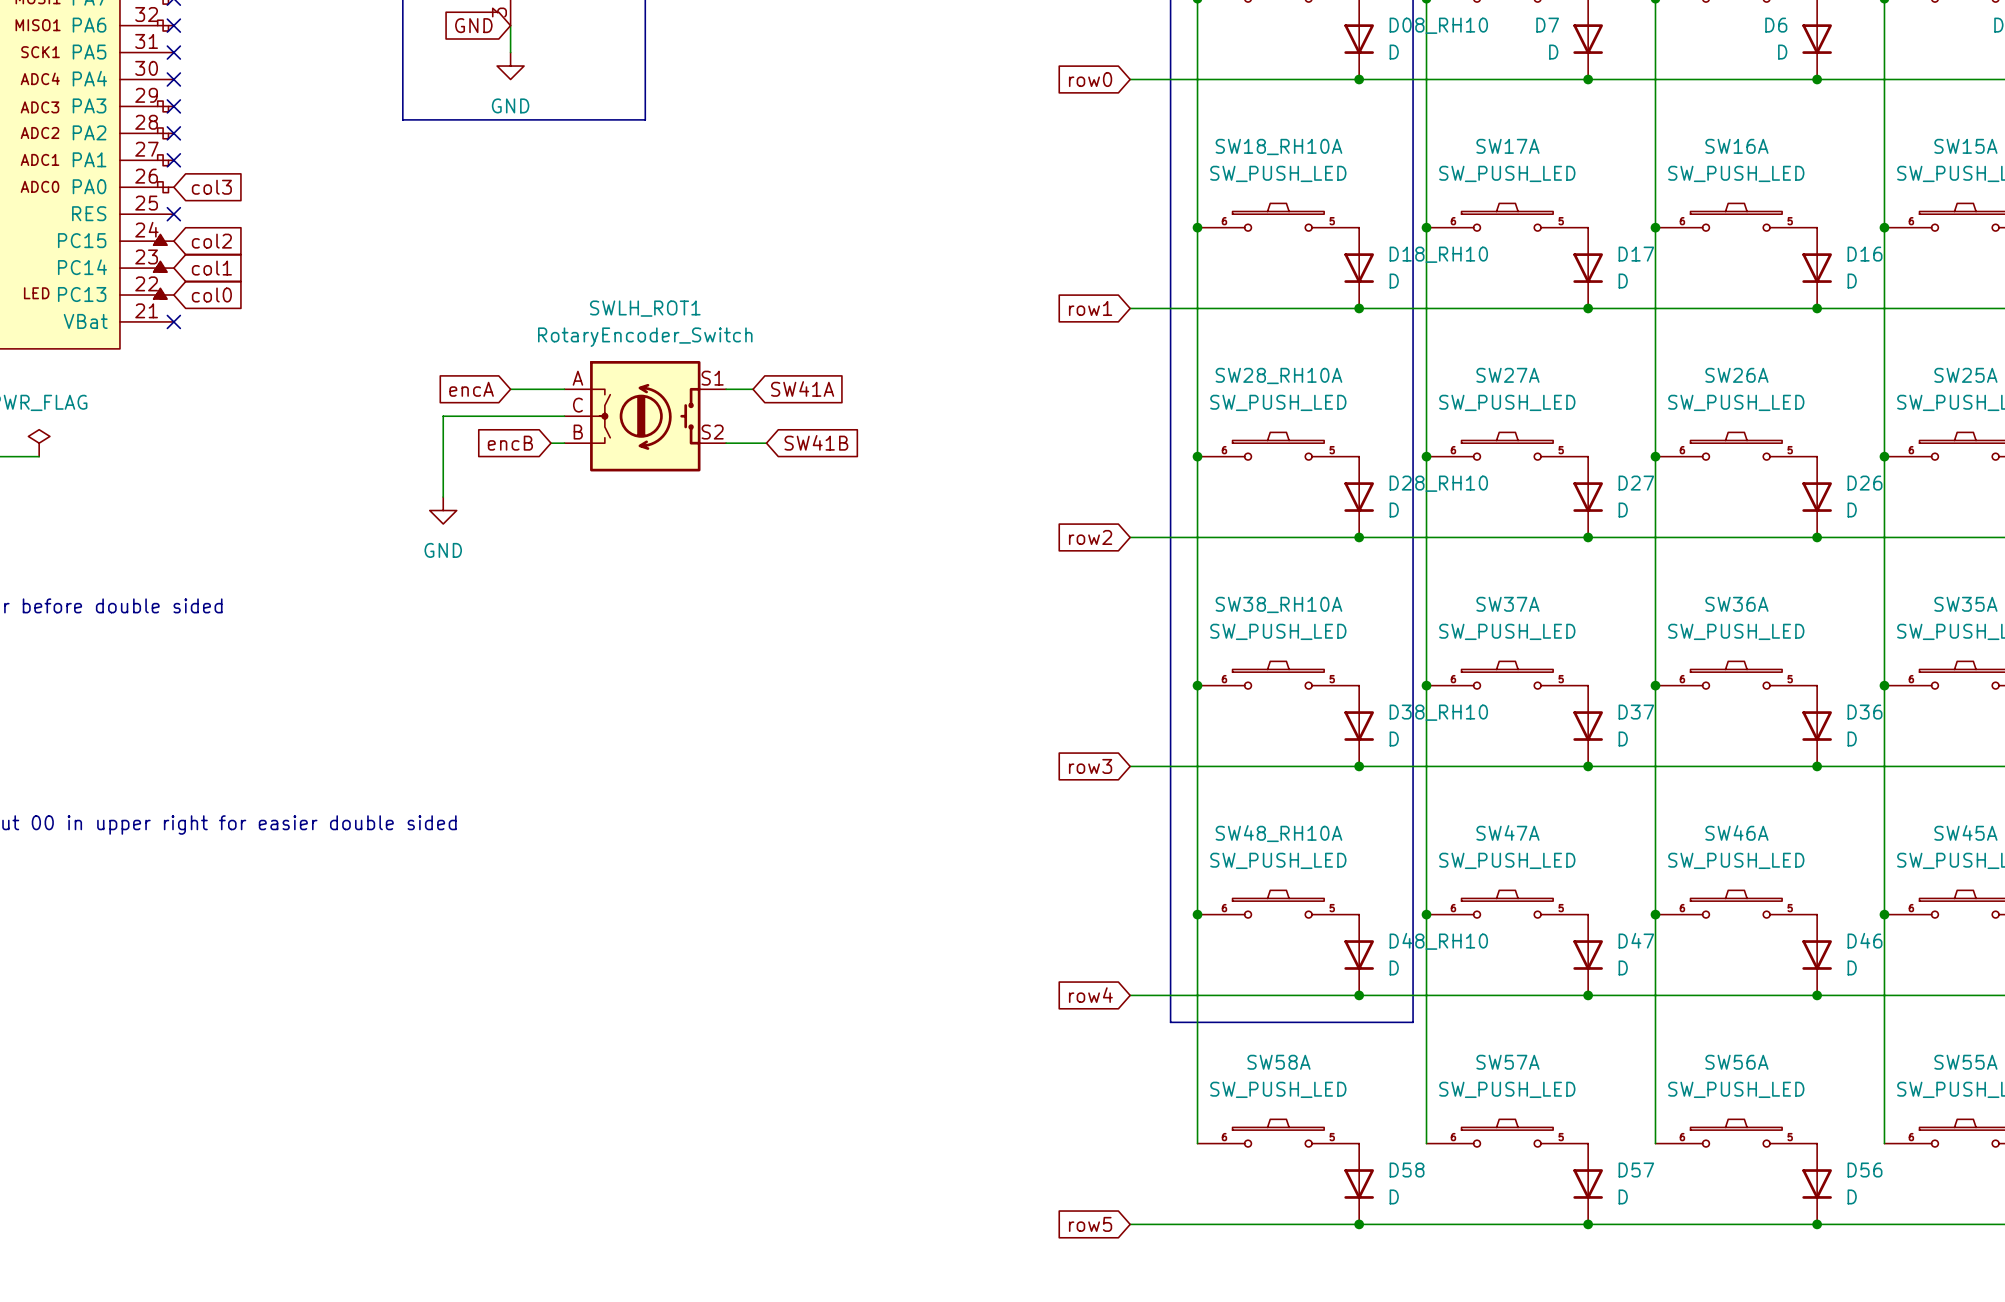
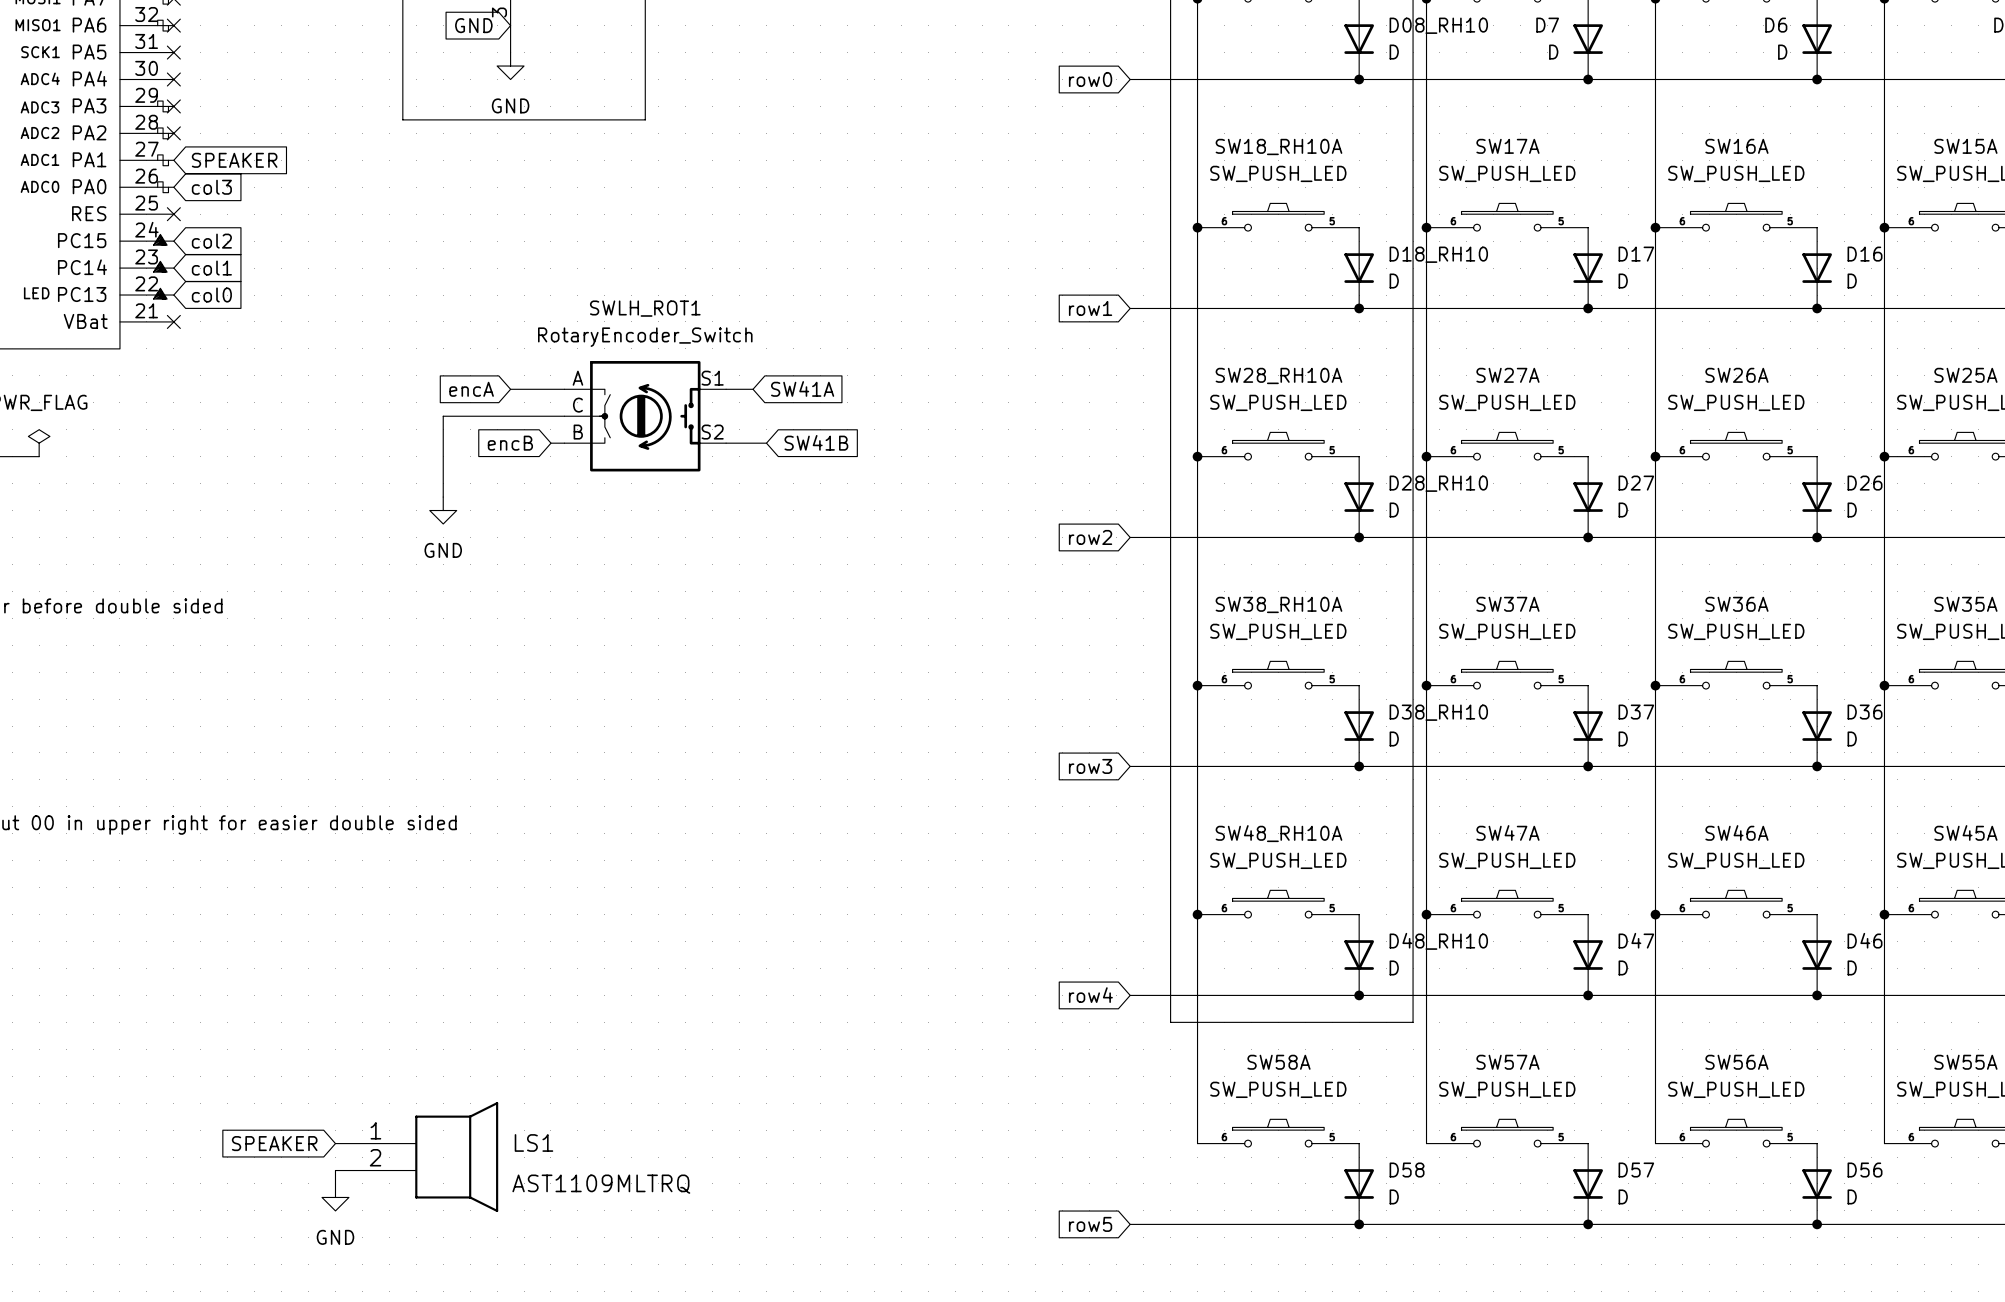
no-connect mark: (173, 160) -> none
global label: none -> SPEAKER (234, 160)
global label: none -> SPEAKER (274, 1143)
LS1: none -> AST1109MLTRQ (416, 1157)
wire: none -> (335, 1170) (335, 1183)
power symbol: none -> GND (335, 1197)

